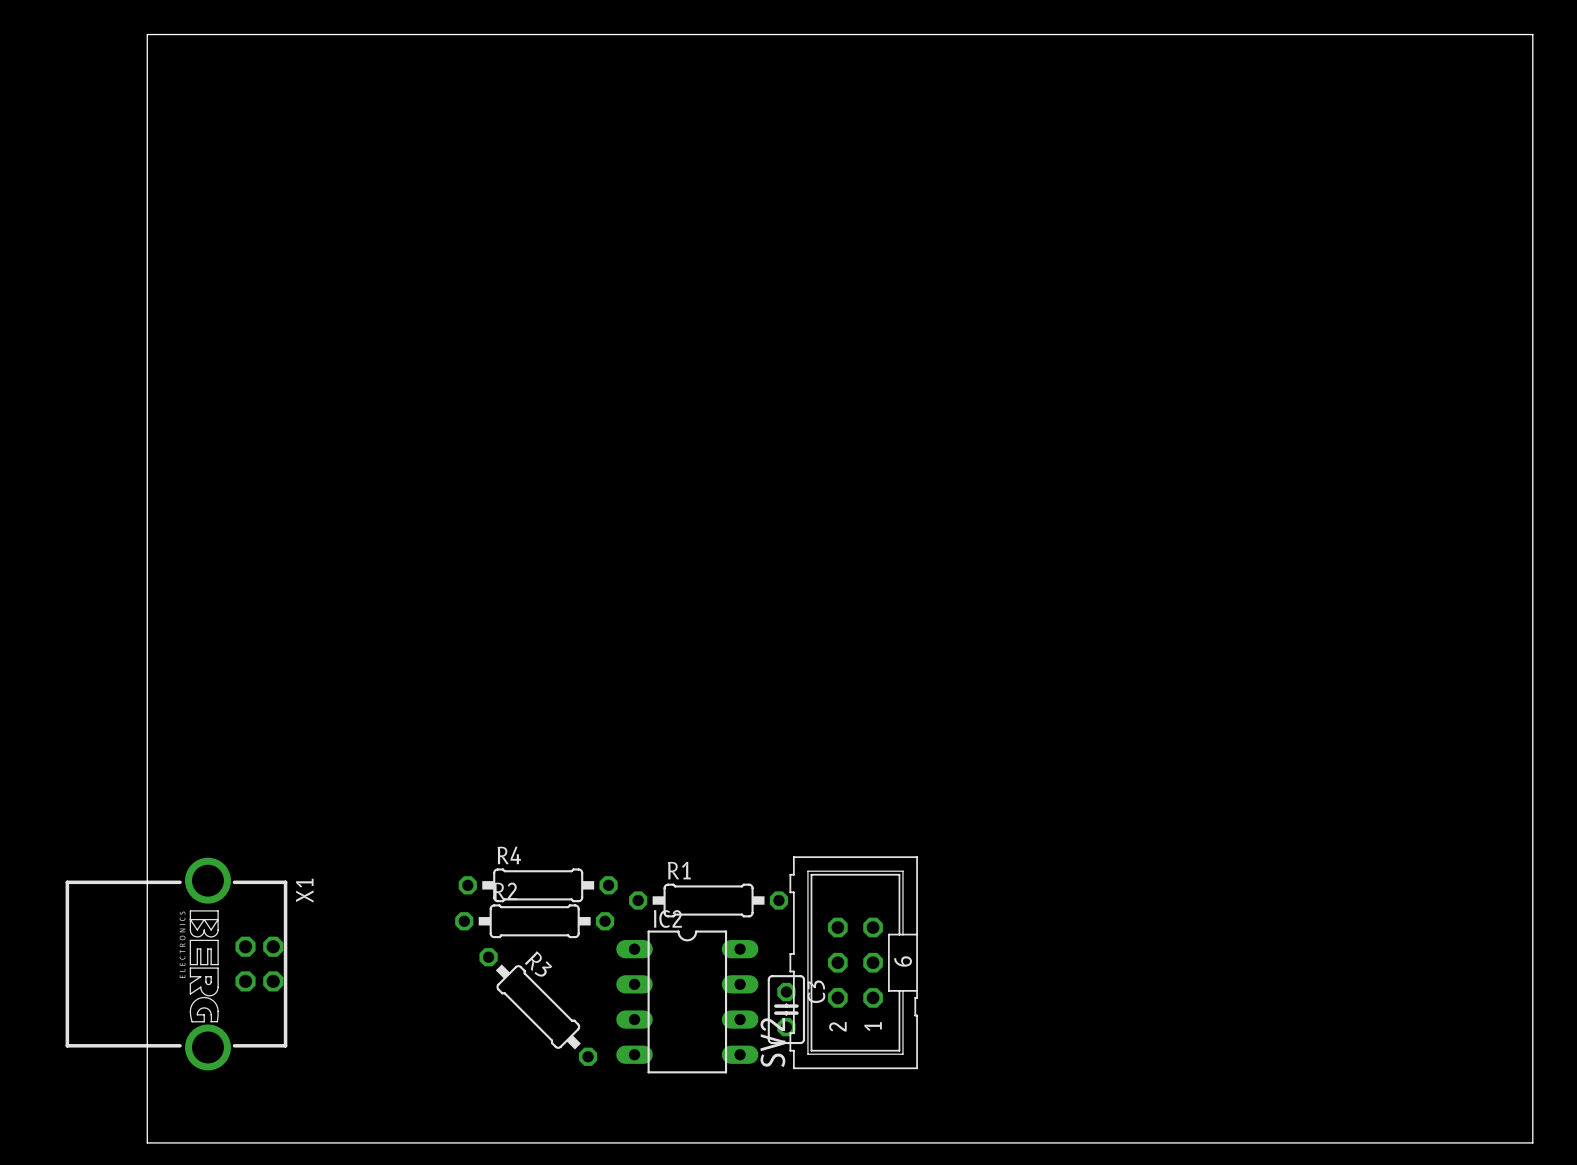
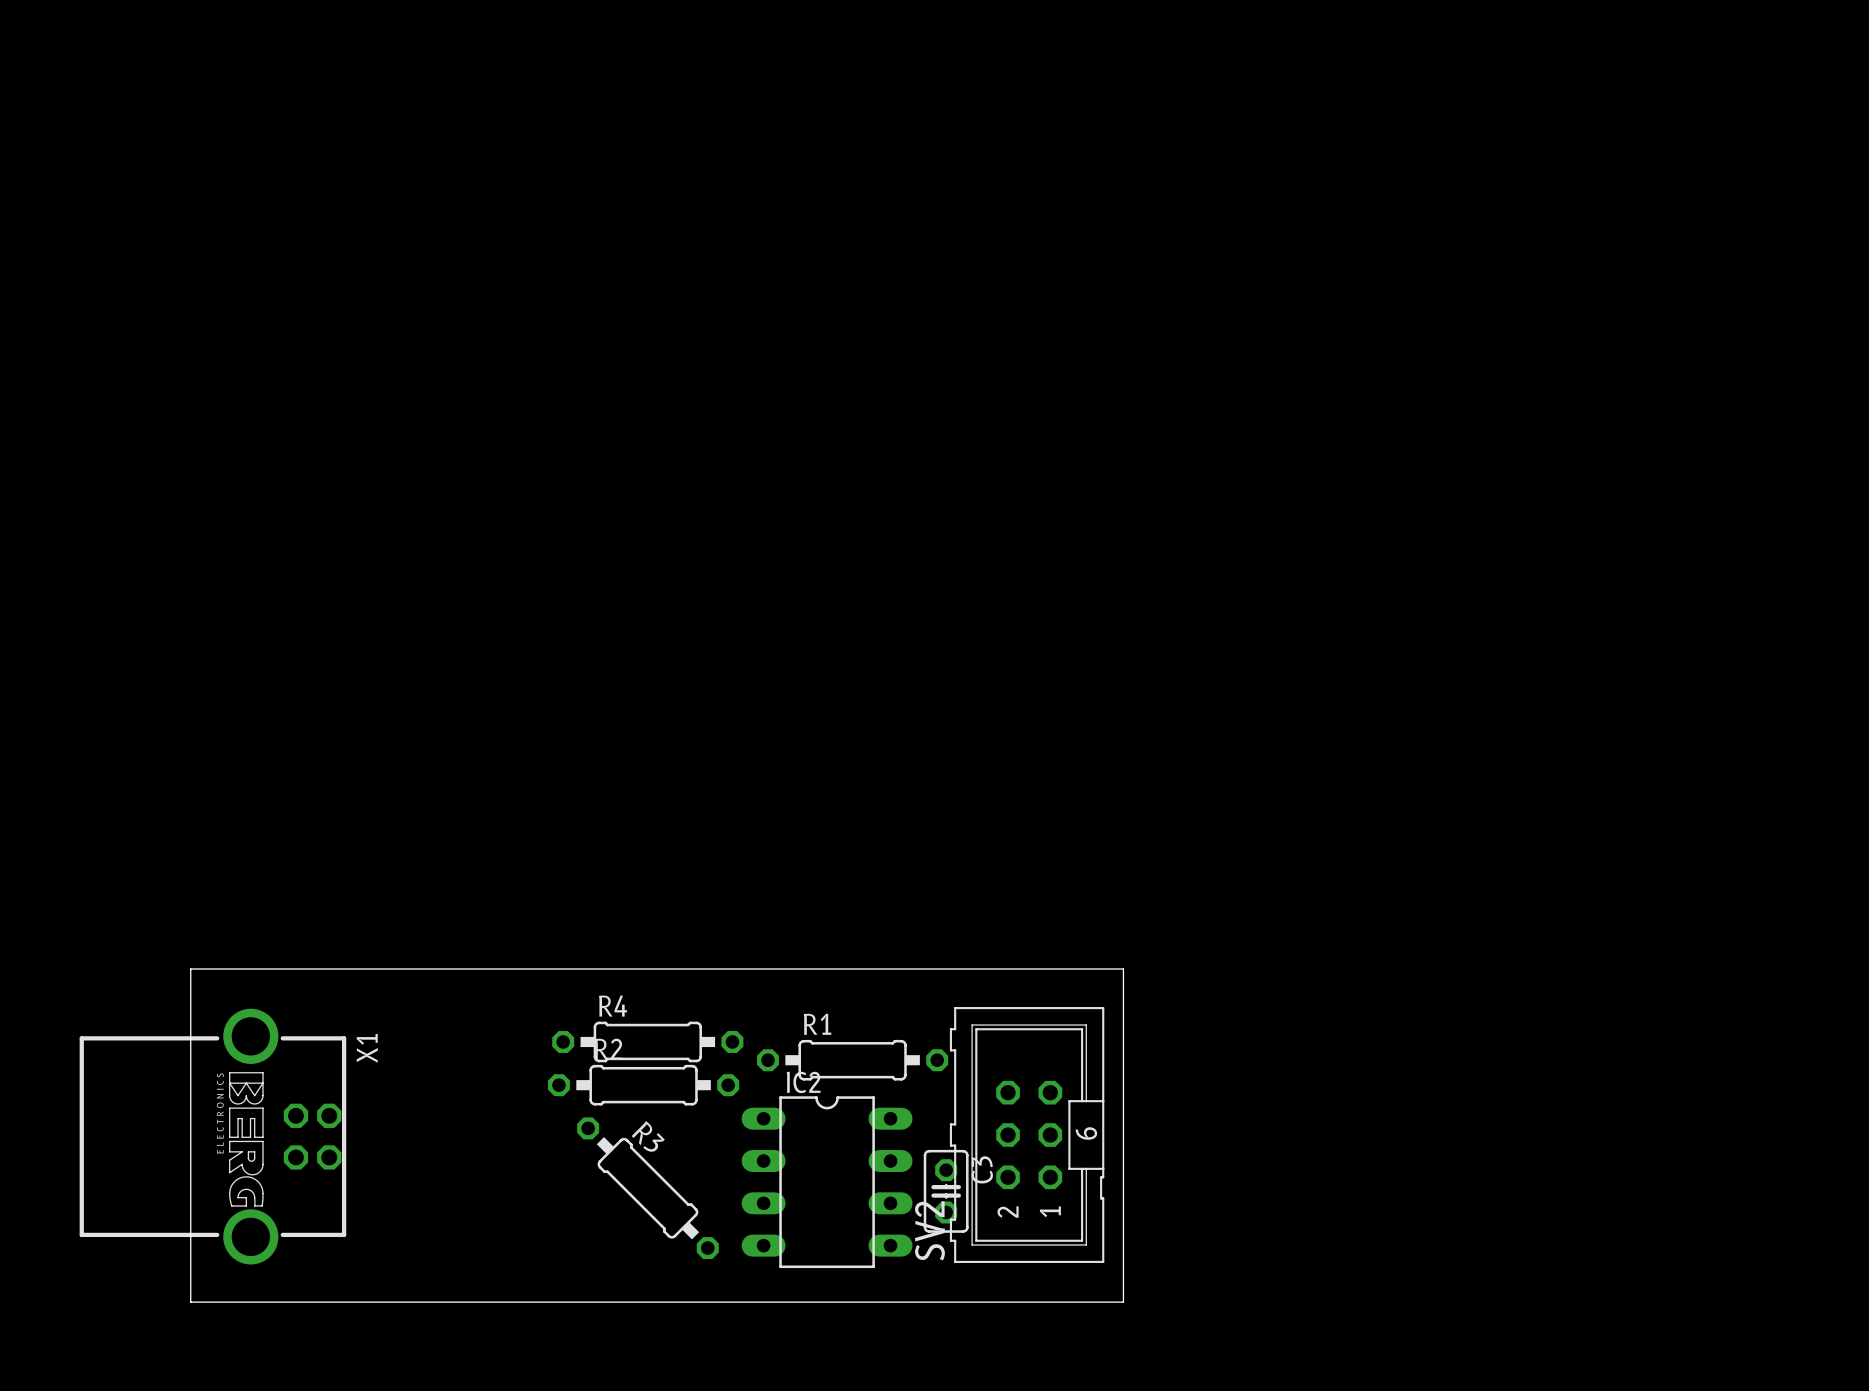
board edge: (147, 34) (1532, 34) (1532, 1142) (147, 1142) (147, 34) -> none
board edge: none -> (190, 969) (1123, 969) (1123, 1302) (190, 1302) (190, 969)

